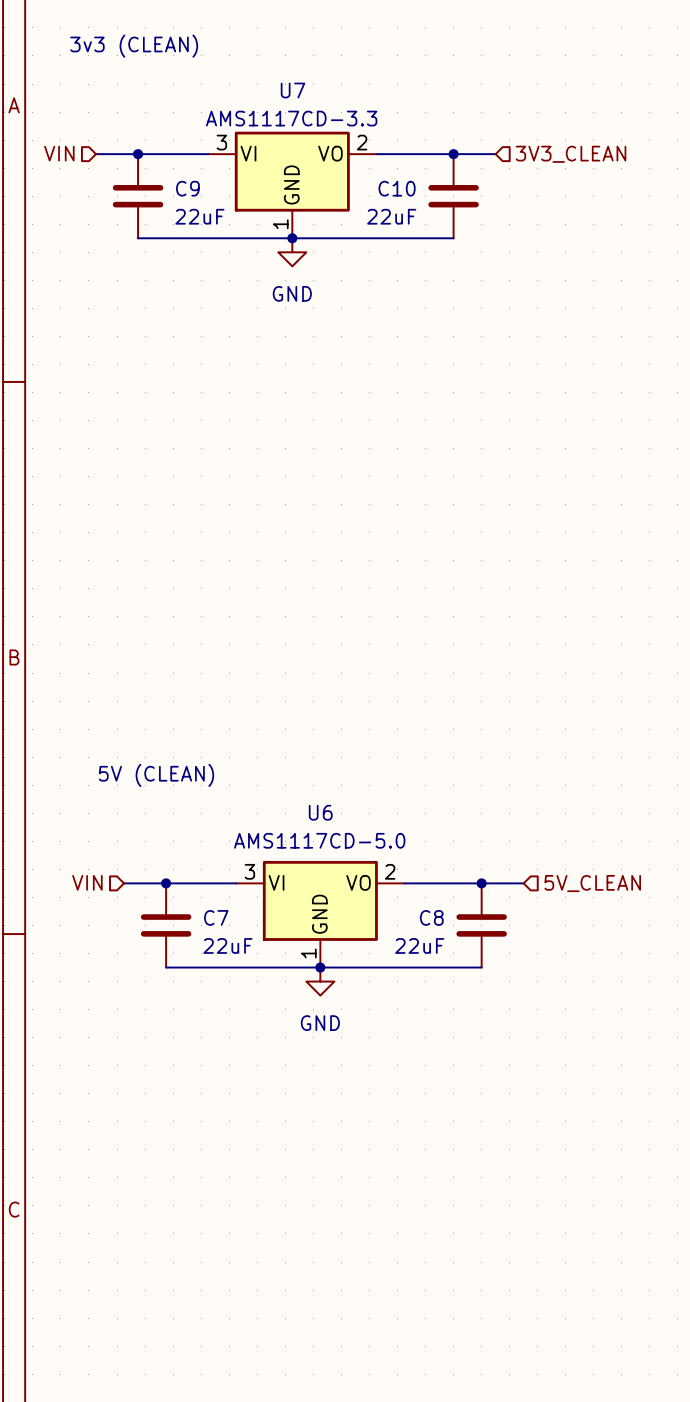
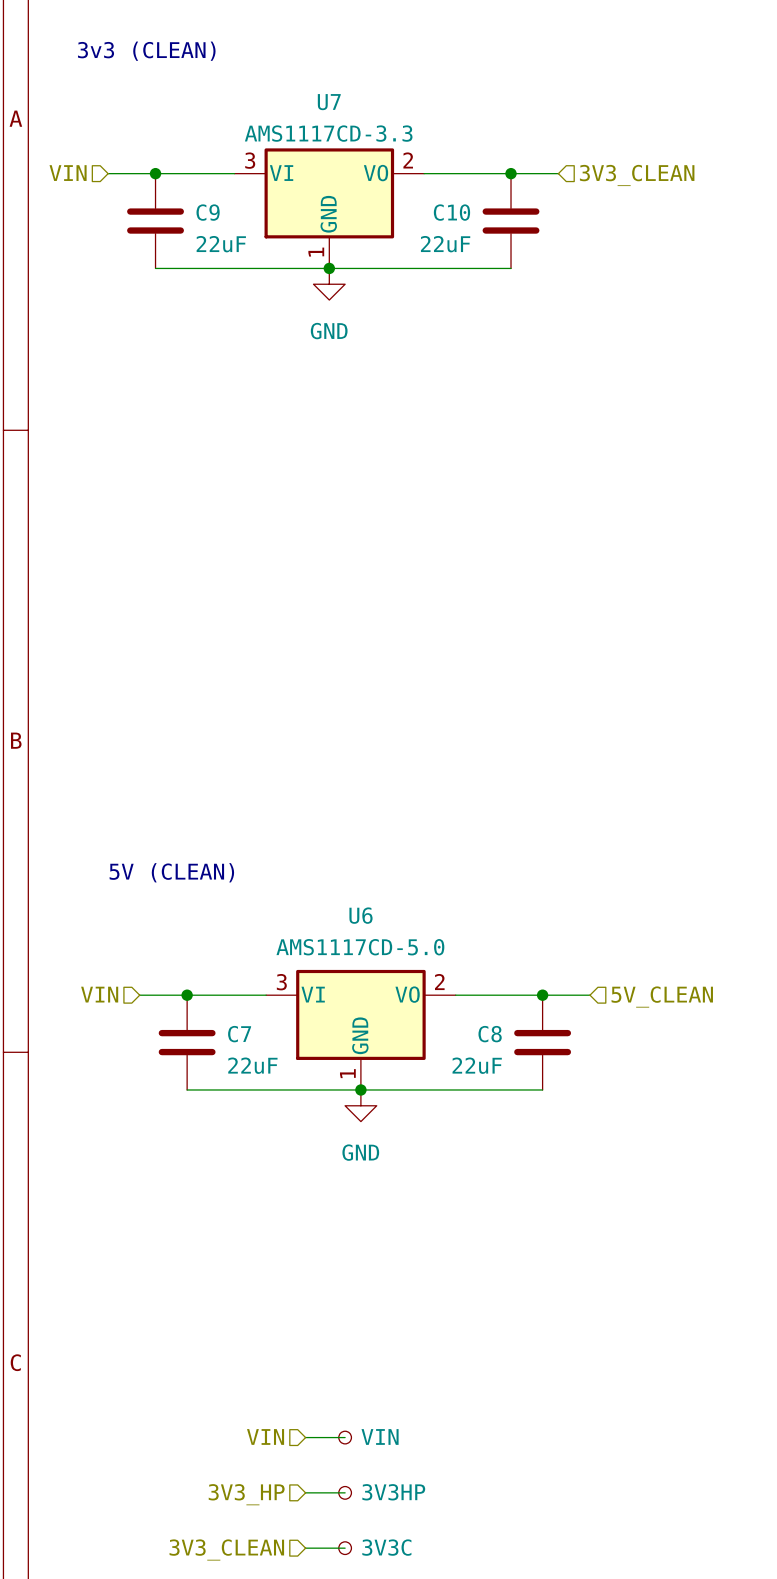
hierarchical label: none -> VIN (265, 1436)
wire: none -> (305, 1437) (345, 1437)
part: none -> VIN (345, 1437)
hierarchical label: none -> 3V3_HP (246, 1494)
wire: none -> (305, 1492) (345, 1492)
part: none -> 3V3HP (345, 1492)
hierarchical label: none -> 3V3_CLEAN (226, 1549)
wire: none -> (305, 1548) (345, 1548)
part: none -> 3V3C (345, 1548)

